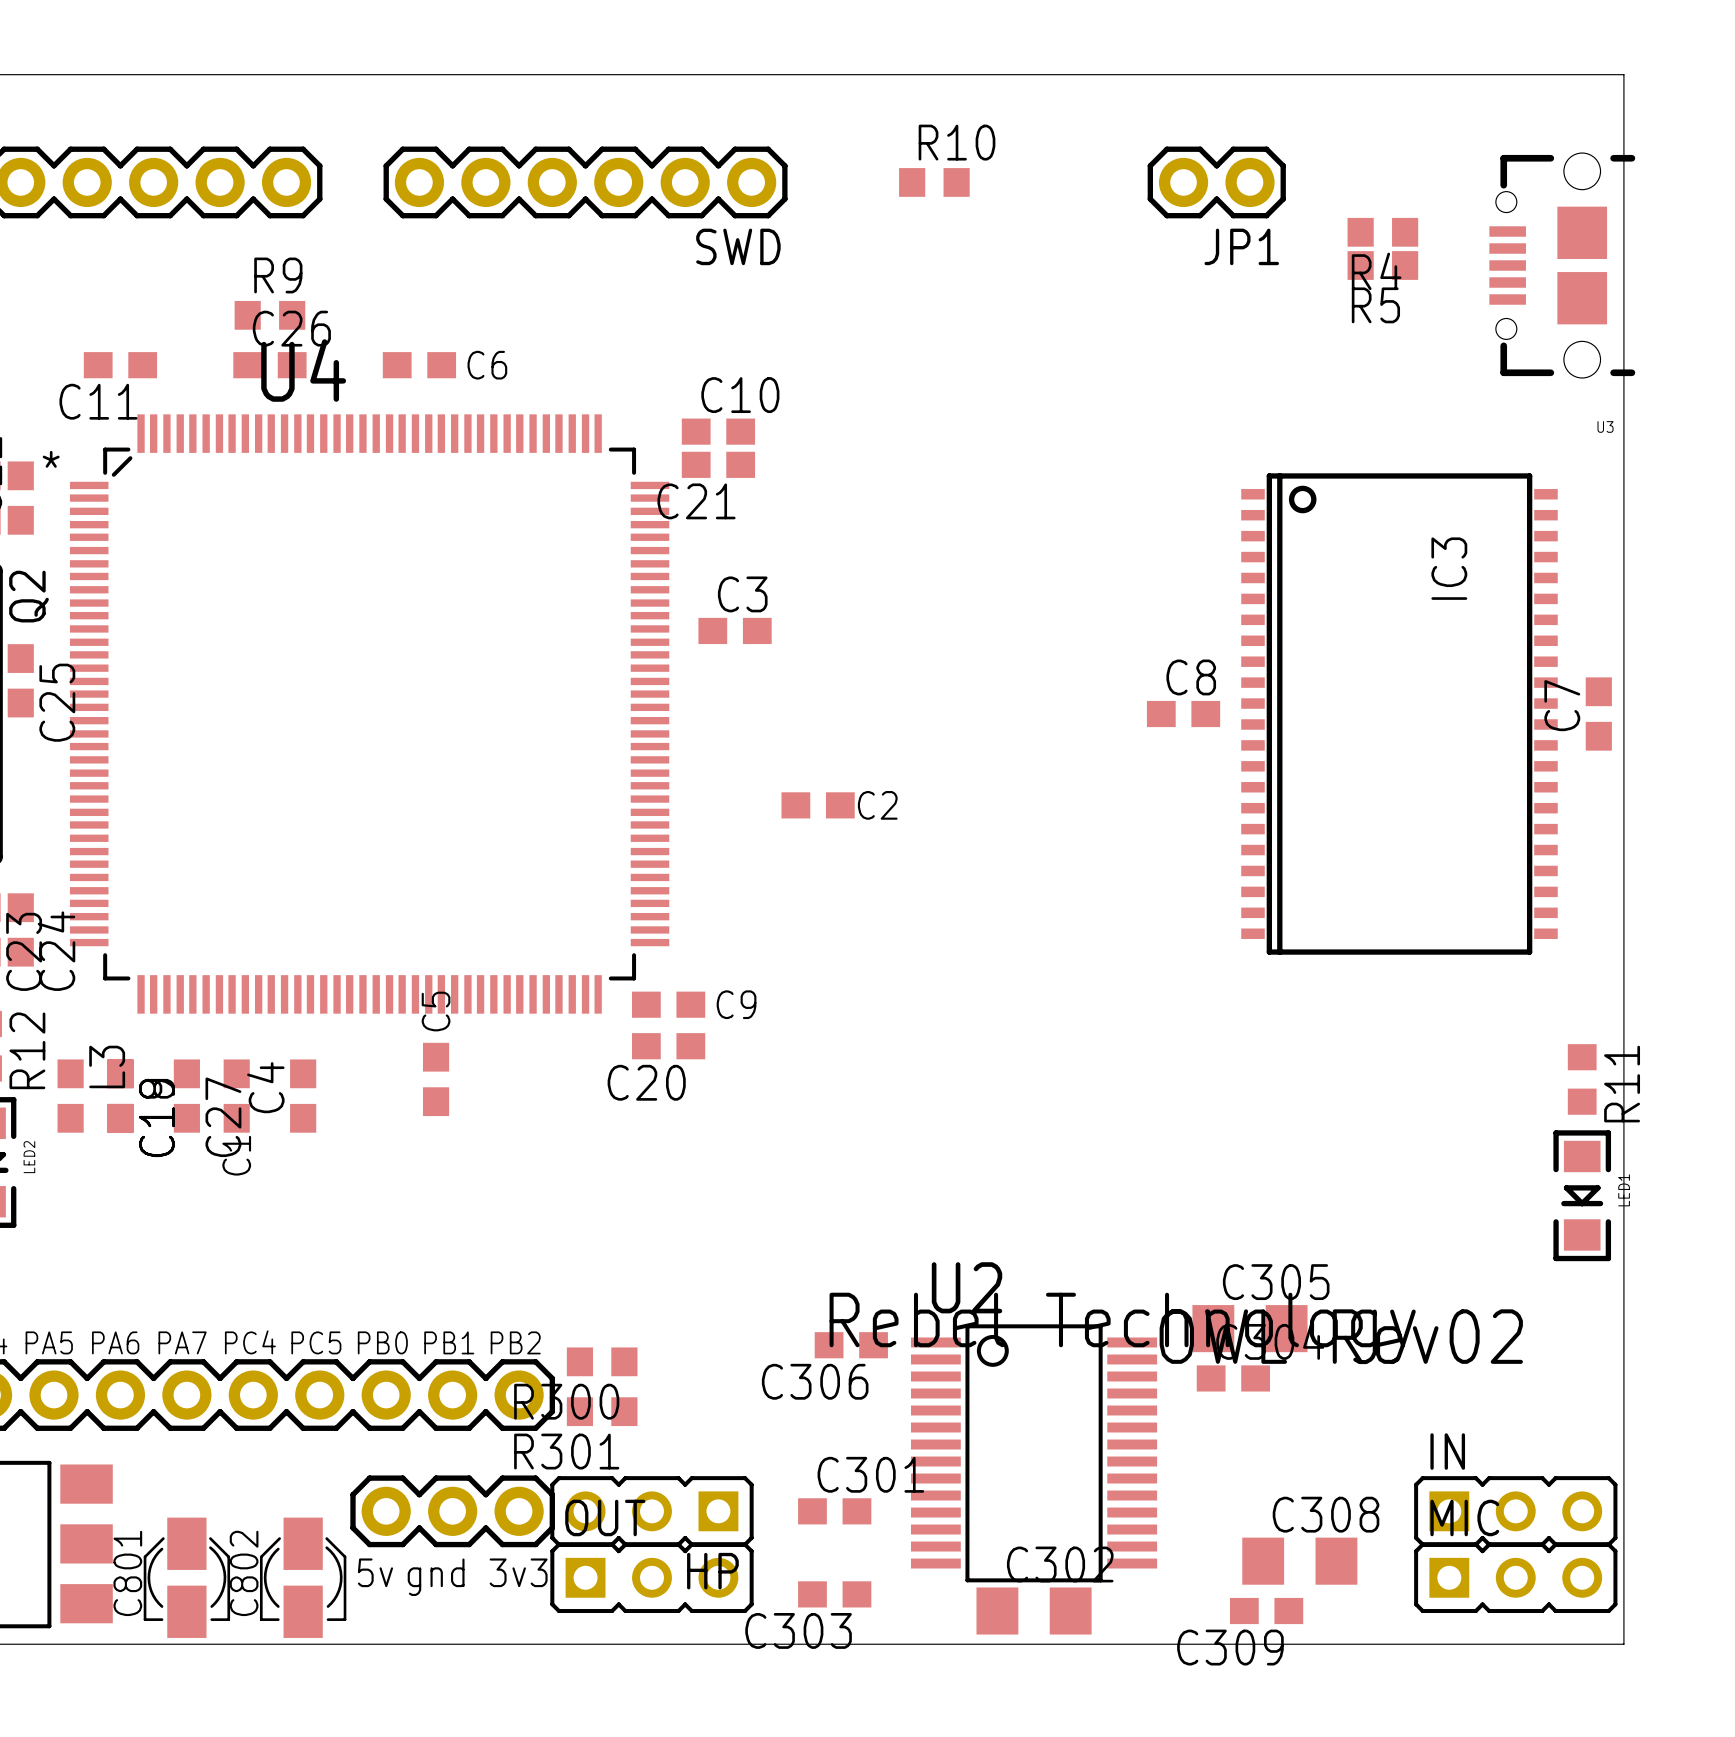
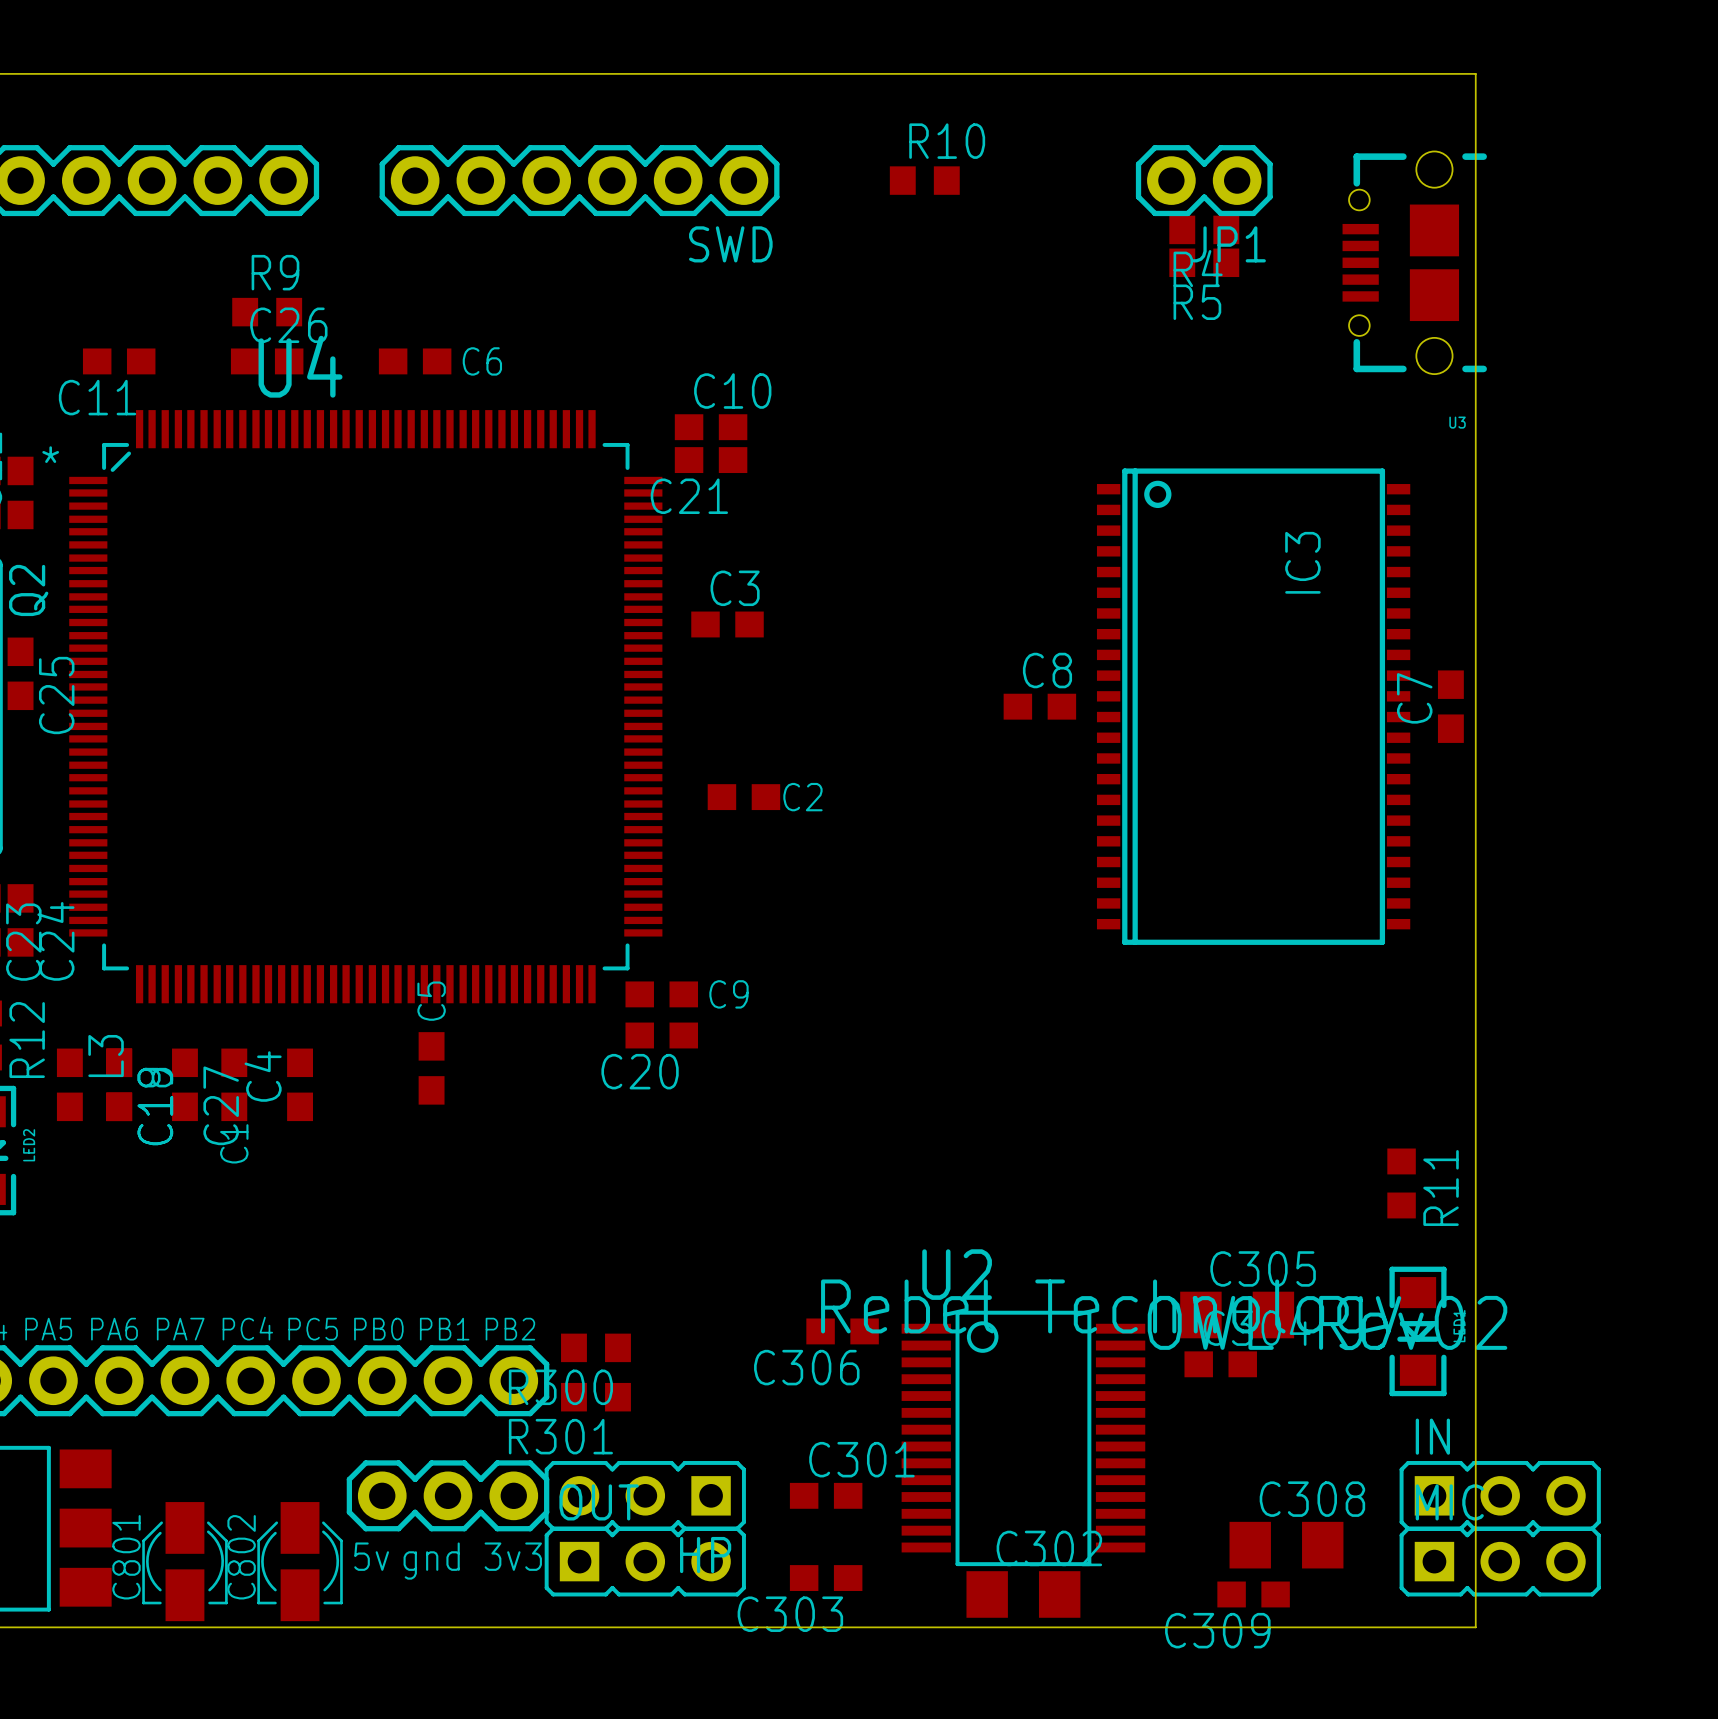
board edge: (1491, 74) (1623, 74) (1623, 1644) (1491, 1644) -> (1475, 73) (1475, 1627)
R4 position: (1382, 232) -> (1204, 229)
R5 position: (1382, 265) -> (1204, 262)
U3 position: (1562, 265) -> (1414, 262)
C8 position: (1183, 714) -> (1039, 706)
IC3 position: (1399, 714) -> (1253, 706)
C7 position: (1598, 714) -> (1450, 706)
C2 position: (818, 805) -> (743, 797)
R11 position: (1582, 1079) -> (1401, 1183)
LED1 position: (1582, 1195) -> (1418, 1331)

